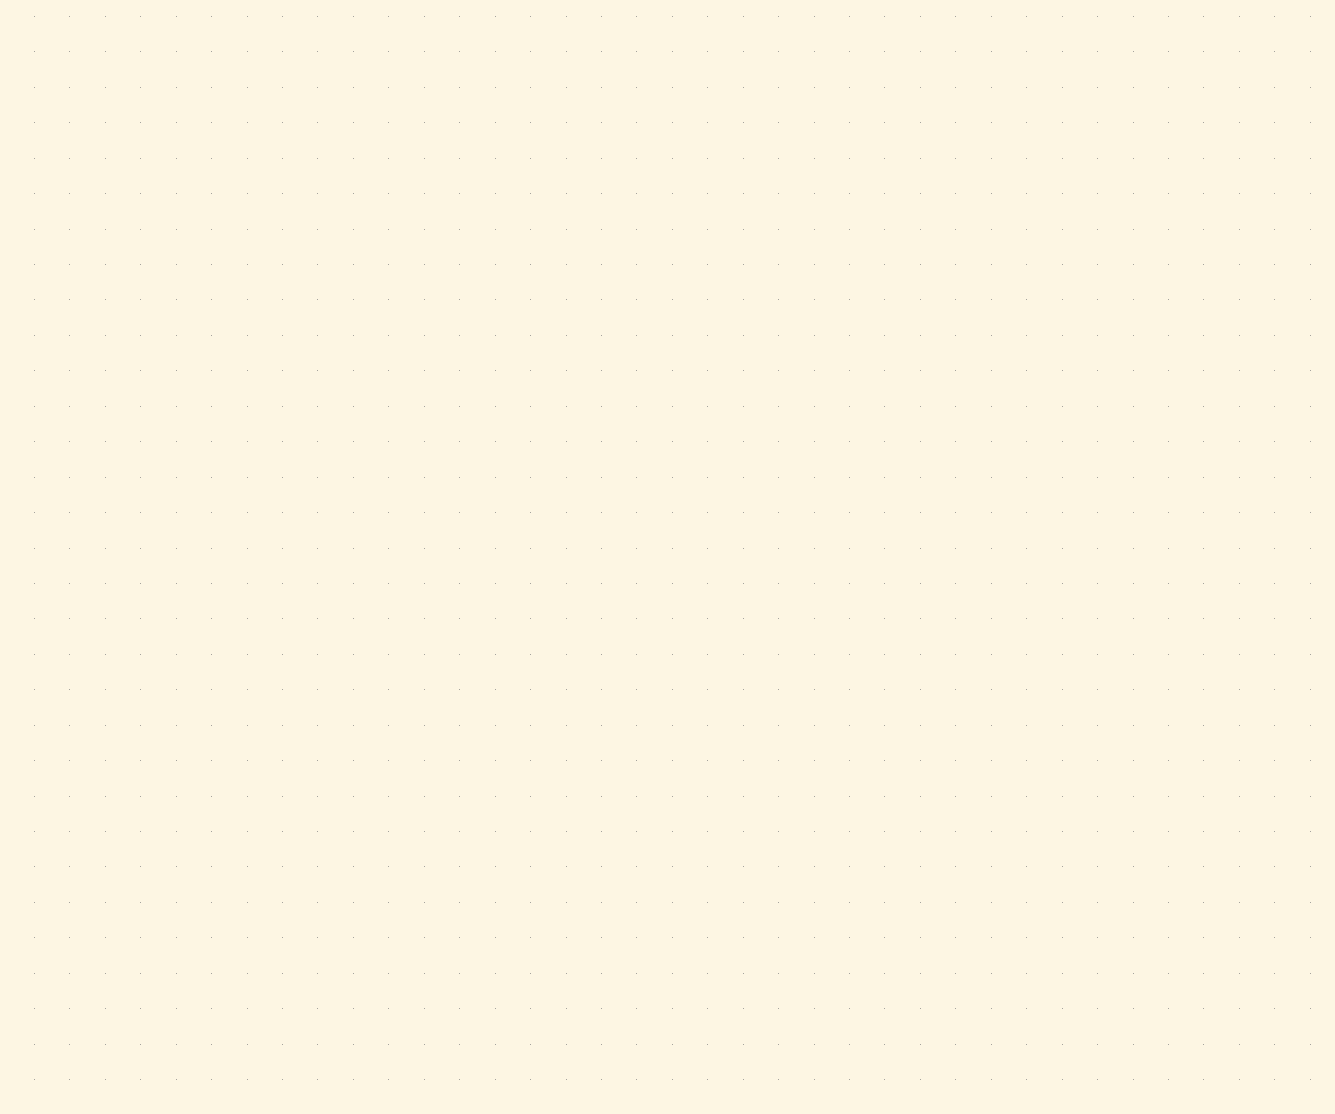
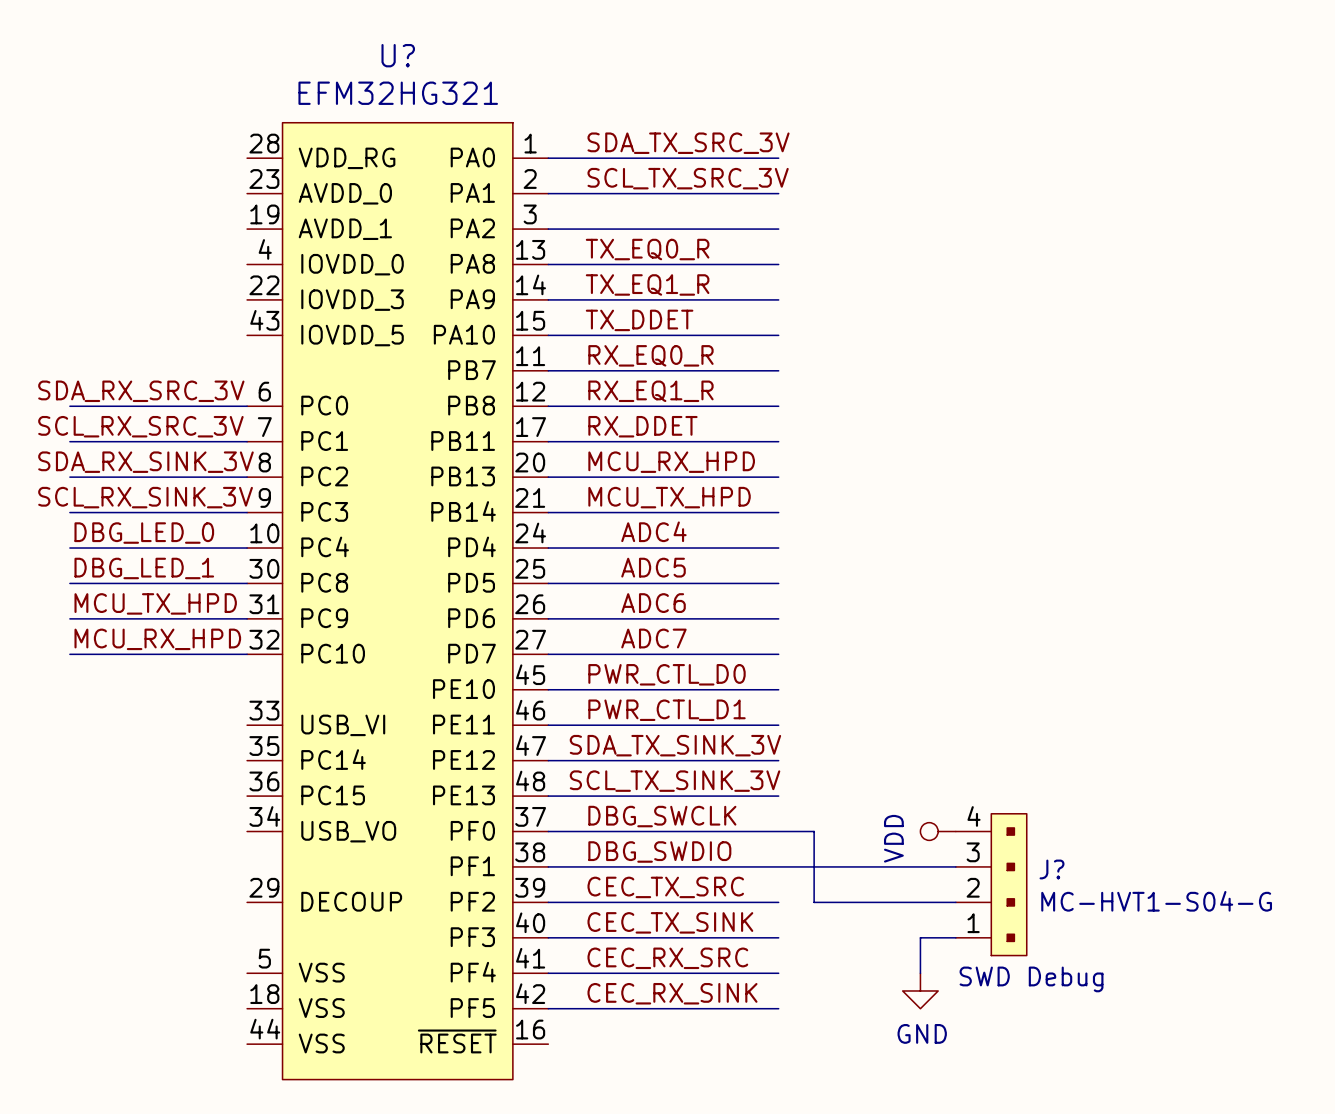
label: none -> SDA_TX_SRC_3V (688, 143)
wire: none -> (548, 158) (778, 158)
label: none -> SCL_TX_SRC_3V (688, 178)
wire: none -> (548, 193) (778, 193)
wire: none -> (548, 229) (778, 229)
label: none -> TX_EQ0_R (647, 249)
wire: none -> (548, 264) (778, 264)
label: none -> TX_EQ1_R (647, 284)
wire: none -> (548, 299) (778, 299)
label: none -> TX_DDET (639, 320)
wire: none -> (548, 335) (778, 335)
label: none -> RX_EQ0_R (650, 355)
wire: none -> (548, 370) (778, 370)
label: none -> SDA_RX_SRC_3V (141, 391)
label: none -> RX_EQ1_R (650, 391)
wire: none -> (69, 406) (247, 406)
wire: none -> (548, 406) (778, 406)
label: none -> SCL_RX_SRC_3V (140, 426)
label: none -> RX_DDET (642, 426)
wire: none -> (69, 441) (247, 441)
wire: none -> (548, 441) (778, 441)
label: none -> SDA_RX_SINK_3V (145, 462)
label: none -> MCU_RX_HPD (671, 462)
wire: none -> (69, 477) (247, 477)
wire: none -> (548, 477) (778, 477)
label: none -> SCL_RX_SINK_3V (145, 497)
label: none -> MCU_TX_HPD (669, 497)
wire: none -> (69, 512) (247, 512)
wire: none -> (548, 512) (778, 512)
label: none -> ADC4 (653, 531)
label: none -> DBG_LED_0 (144, 533)
wire: none -> (69, 548) (247, 548)
wire: none -> (548, 548) (778, 548)
label: none -> ADC5 (653, 567)
label: none -> DBG_LED_1 (144, 568)
wire: none -> (69, 583) (247, 583)
wire: none -> (548, 583) (778, 583)
U?: none -> EFM32HG321 (397, 601)
label: none -> MCU_TX_HPD (155, 603)
label: none -> ADC6 (653, 603)
wire: none -> (69, 618) (247, 618)
wire: none -> (548, 618) (778, 618)
label: none -> ADC7 (653, 638)
label: none -> MCU_RX_HPD (157, 639)
wire: none -> (69, 654) (247, 654)
wire: none -> (548, 654) (778, 654)
label: none -> PWR_CTL_D0 (667, 674)
wire: none -> (548, 689) (778, 689)
label: none -> PWR_CTL_D1 (667, 710)
wire: none -> (548, 725) (778, 725)
label: none -> SDA_TX_SINK_3V (675, 745)
wire: none -> (548, 760) (778, 760)
label: none -> SCL_TX_SINK_3V (675, 781)
wire: none -> (548, 796) (778, 796)
label: none -> DBG_SWCLK (662, 816)
wire: none -> (548, 831) (814, 831) (814, 902) (955, 902)
power symbol: none -> VDD (938, 831)
label: none -> DBG_SWDIO (659, 851)
wire: none -> (548, 866) (955, 866)
J?: none -> MC-HVT1-S04-G (991, 884)
label: none -> CEC_TX_SRC (665, 887)
wire: none -> (548, 902) (778, 902)
label: none -> CEC_TX_SINK (670, 922)
wire: none -> (548, 937) (778, 937)
wire: none -> (955, 937) (920, 937) (920, 973)
label: none -> CEC_RX_SRC (667, 958)
wire: none -> (548, 973) (778, 973)
text: none -> SWD Debug (1031, 979)
power symbol: none -> GND (920, 990)
label: none -> CEC_RX_SINK (672, 993)
wire: none -> (548, 1008) (778, 1008)

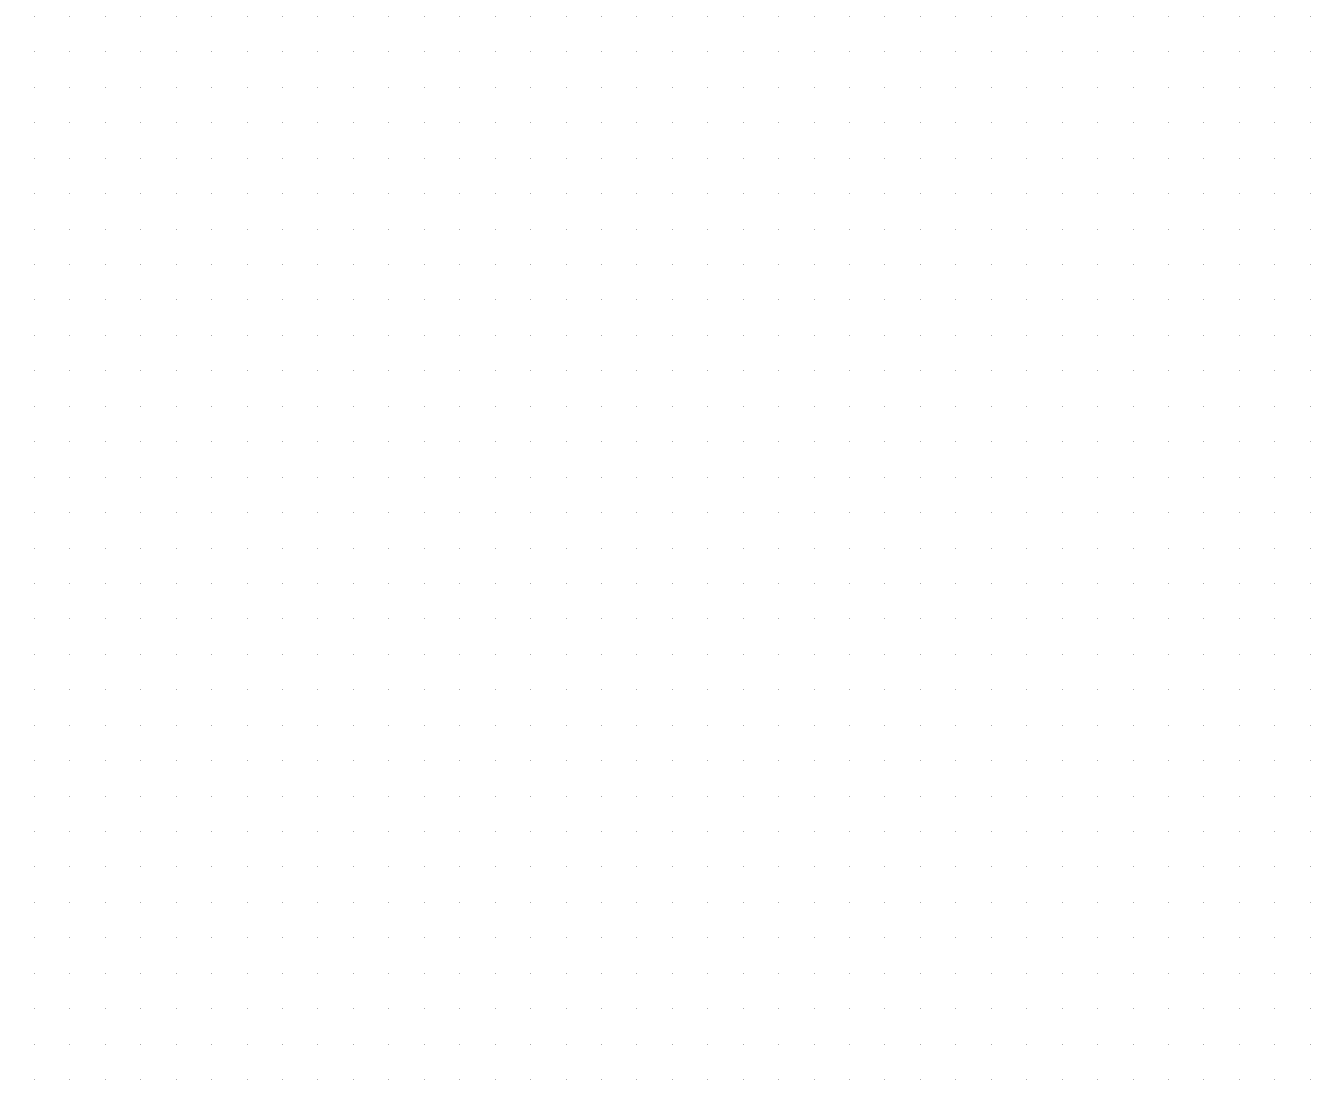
label: SDA_TX_SRC_3V (688, 143) -> none
wire: (548, 158) (778, 158) -> none
label: SCL_TX_SRC_3V (688, 178) -> none
wire: (548, 193) (778, 193) -> none
wire: (548, 229) (778, 229) -> none
label: TX_EQ0_R (647, 249) -> none
wire: (548, 264) (778, 264) -> none
label: TX_EQ1_R (647, 284) -> none
wire: (548, 299) (778, 299) -> none
label: TX_DDET (639, 320) -> none
wire: (548, 335) (778, 335) -> none
label: RX_EQ0_R (650, 355) -> none
wire: (548, 370) (778, 370) -> none
label: SDA_RX_SRC_3V (141, 391) -> none
label: RX_EQ1_R (650, 391) -> none
wire: (69, 406) (247, 406) -> none
wire: (548, 406) (778, 406) -> none
label: SCL_RX_SRC_3V (140, 426) -> none
label: RX_DDET (642, 426) -> none
wire: (69, 441) (247, 441) -> none
wire: (548, 441) (778, 441) -> none
label: SDA_RX_SINK_3V (145, 462) -> none
label: MCU_RX_HPD (671, 462) -> none
wire: (69, 477) (247, 477) -> none
wire: (548, 477) (778, 477) -> none
label: SCL_RX_SINK_3V (145, 497) -> none
label: MCU_TX_HPD (669, 497) -> none
wire: (69, 512) (247, 512) -> none
wire: (548, 512) (778, 512) -> none
label: ADC4 (653, 531) -> none
label: DBG_LED_0 (144, 533) -> none
wire: (69, 548) (247, 548) -> none
wire: (548, 548) (778, 548) -> none
label: ADC5 (653, 567) -> none
label: DBG_LED_1 (144, 568) -> none
wire: (69, 583) (247, 583) -> none
wire: (548, 583) (778, 583) -> none
U?: EFM32HG321 (397, 601) -> none
label: MCU_TX_HPD (155, 603) -> none
label: ADC6 (653, 603) -> none
wire: (69, 618) (247, 618) -> none
wire: (548, 618) (778, 618) -> none
label: ADC7 (653, 638) -> none
label: MCU_RX_HPD (157, 639) -> none
wire: (69, 654) (247, 654) -> none
wire: (548, 654) (778, 654) -> none
label: PWR_CTL_D0 (667, 674) -> none
wire: (548, 689) (778, 689) -> none
label: PWR_CTL_D1 (667, 710) -> none
wire: (548, 725) (778, 725) -> none
label: SDA_TX_SINK_3V (675, 745) -> none
wire: (548, 760) (778, 760) -> none
label: SCL_TX_SINK_3V (675, 781) -> none
wire: (548, 796) (778, 796) -> none
label: DBG_SWCLK (662, 816) -> none
wire: (548, 831) (814, 831) (814, 902) (955, 902) -> none
power symbol: VDD (938, 831) -> none
label: DBG_SWDIO (659, 851) -> none
wire: (548, 866) (955, 866) -> none
J?: MC-HVT1-S04-G (991, 884) -> none
label: CEC_TX_SRC (665, 887) -> none
wire: (548, 902) (778, 902) -> none
label: CEC_TX_SINK (670, 922) -> none
wire: (548, 937) (778, 937) -> none
wire: (955, 937) (920, 937) (920, 973) -> none
label: CEC_RX_SRC (667, 958) -> none
wire: (548, 973) (778, 973) -> none
text: SWD Debug (1031, 979) -> none
power symbol: GND (920, 990) -> none
label: CEC_RX_SINK (672, 993) -> none
wire: (548, 1008) (778, 1008) -> none

